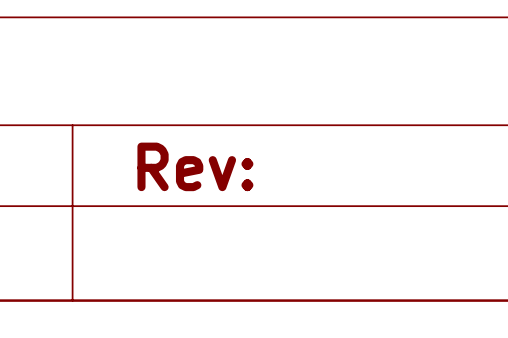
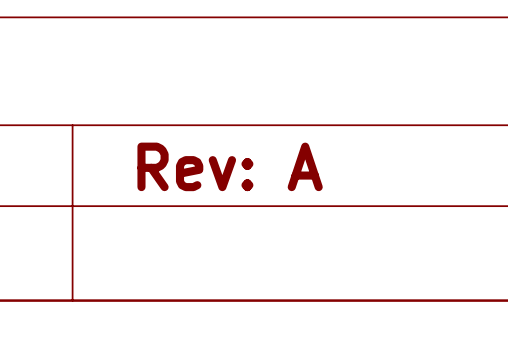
title block: Rev: (195, 166) -> Rev: A (230, 166)

